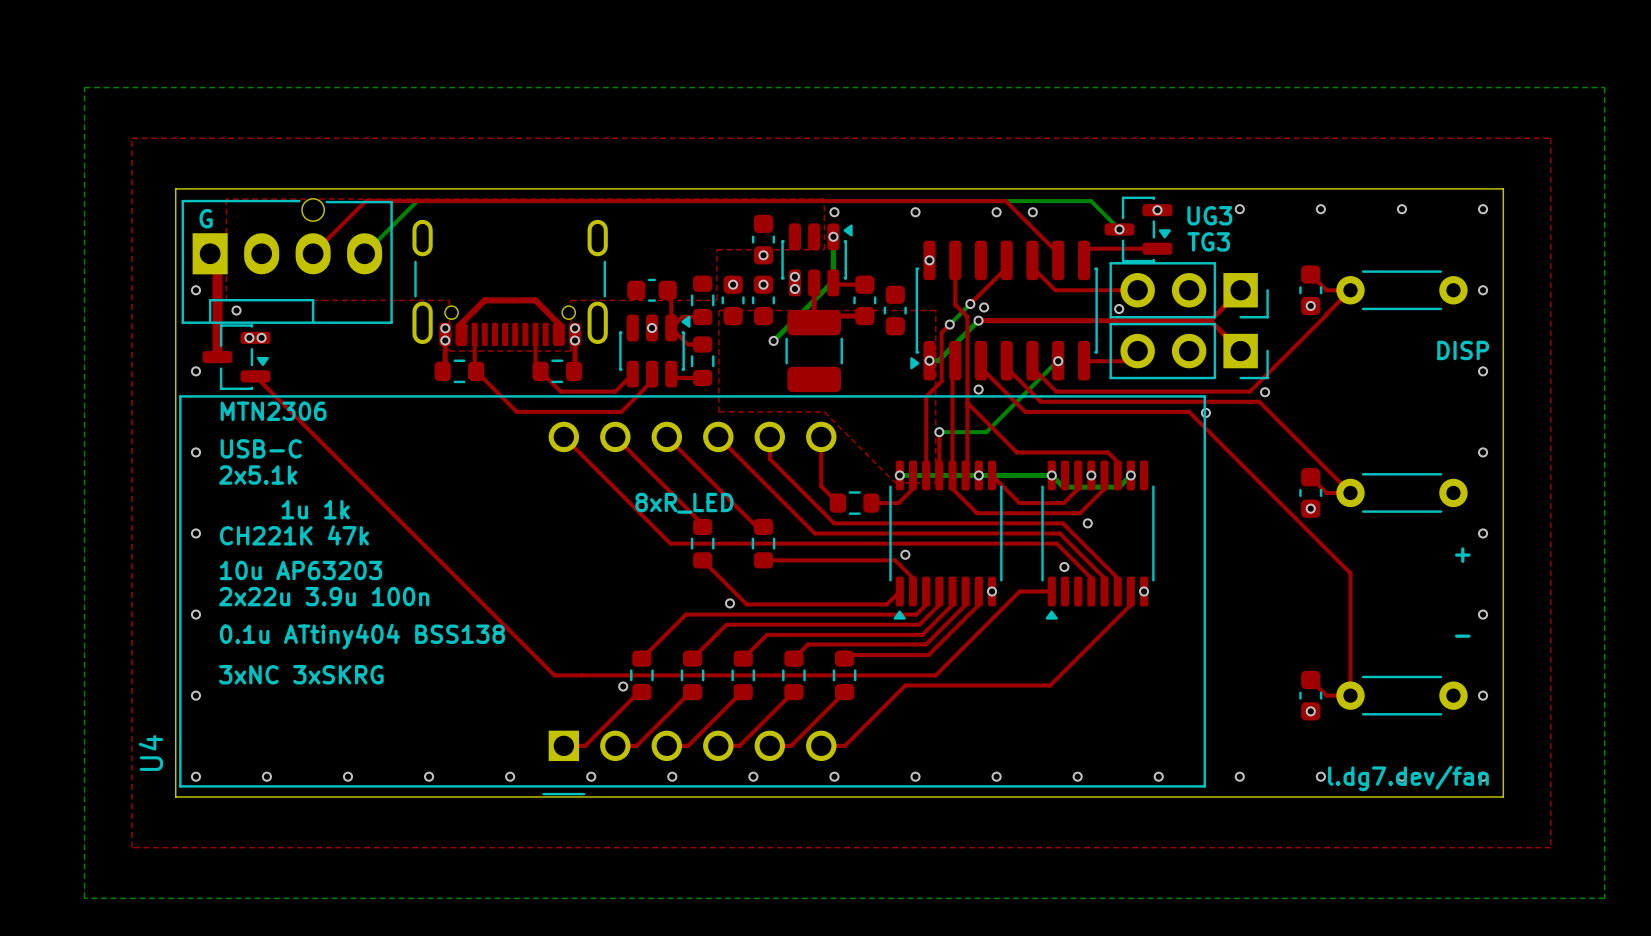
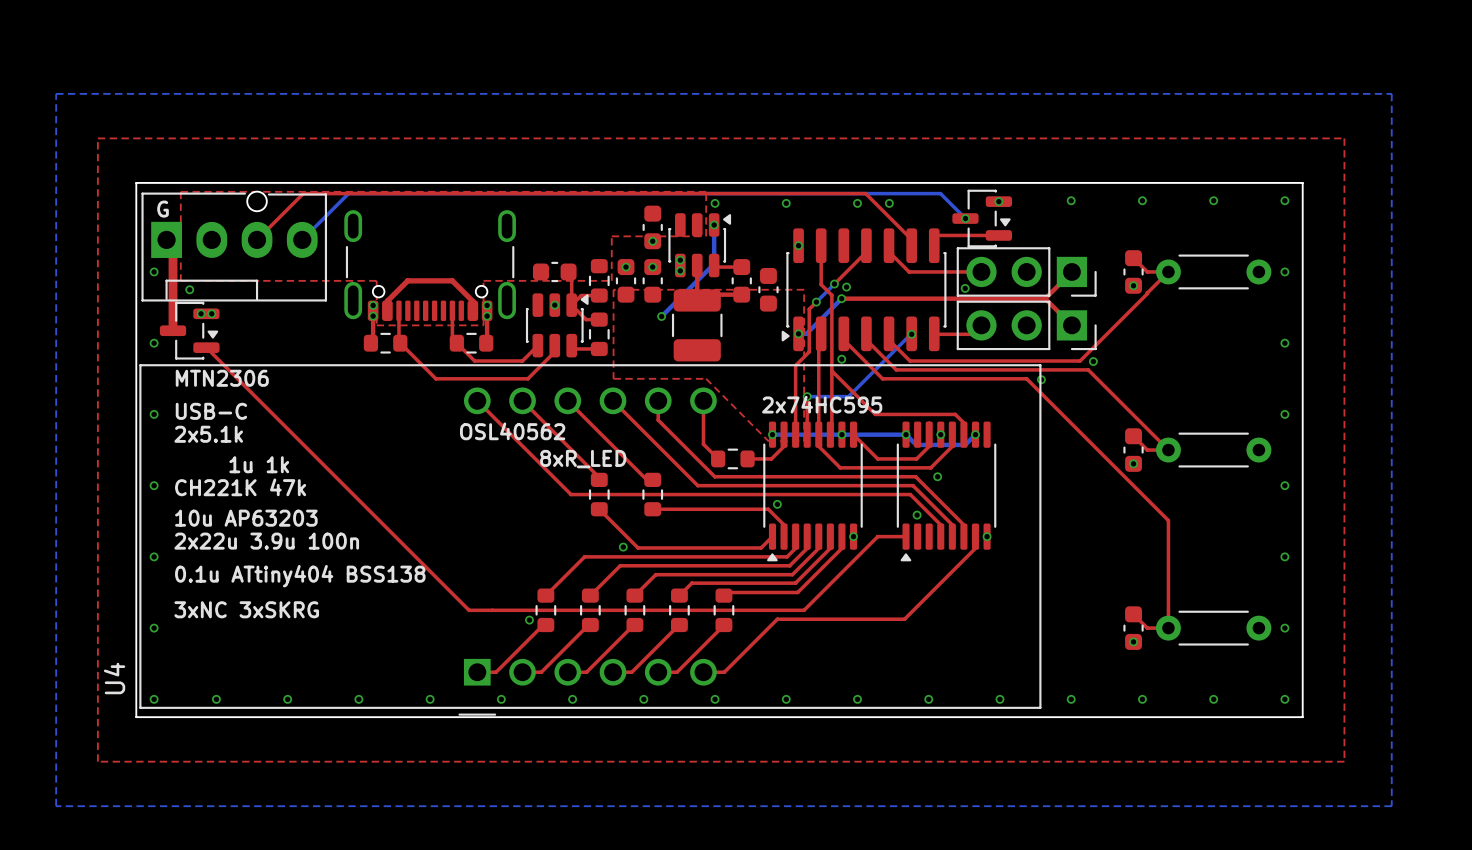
text: UG3 (1209, 215) -> none
text: TG3 (1208, 241) -> none
text: DISP (1463, 350) -> none
text: none -> 2x74HC595 (822, 404)
text: none -> OSL40562 (512, 431)
text: + (1462, 555) -> none
text: - (1462, 636) -> none
text: l.dg7.dev/fan (1408, 778) -> none

